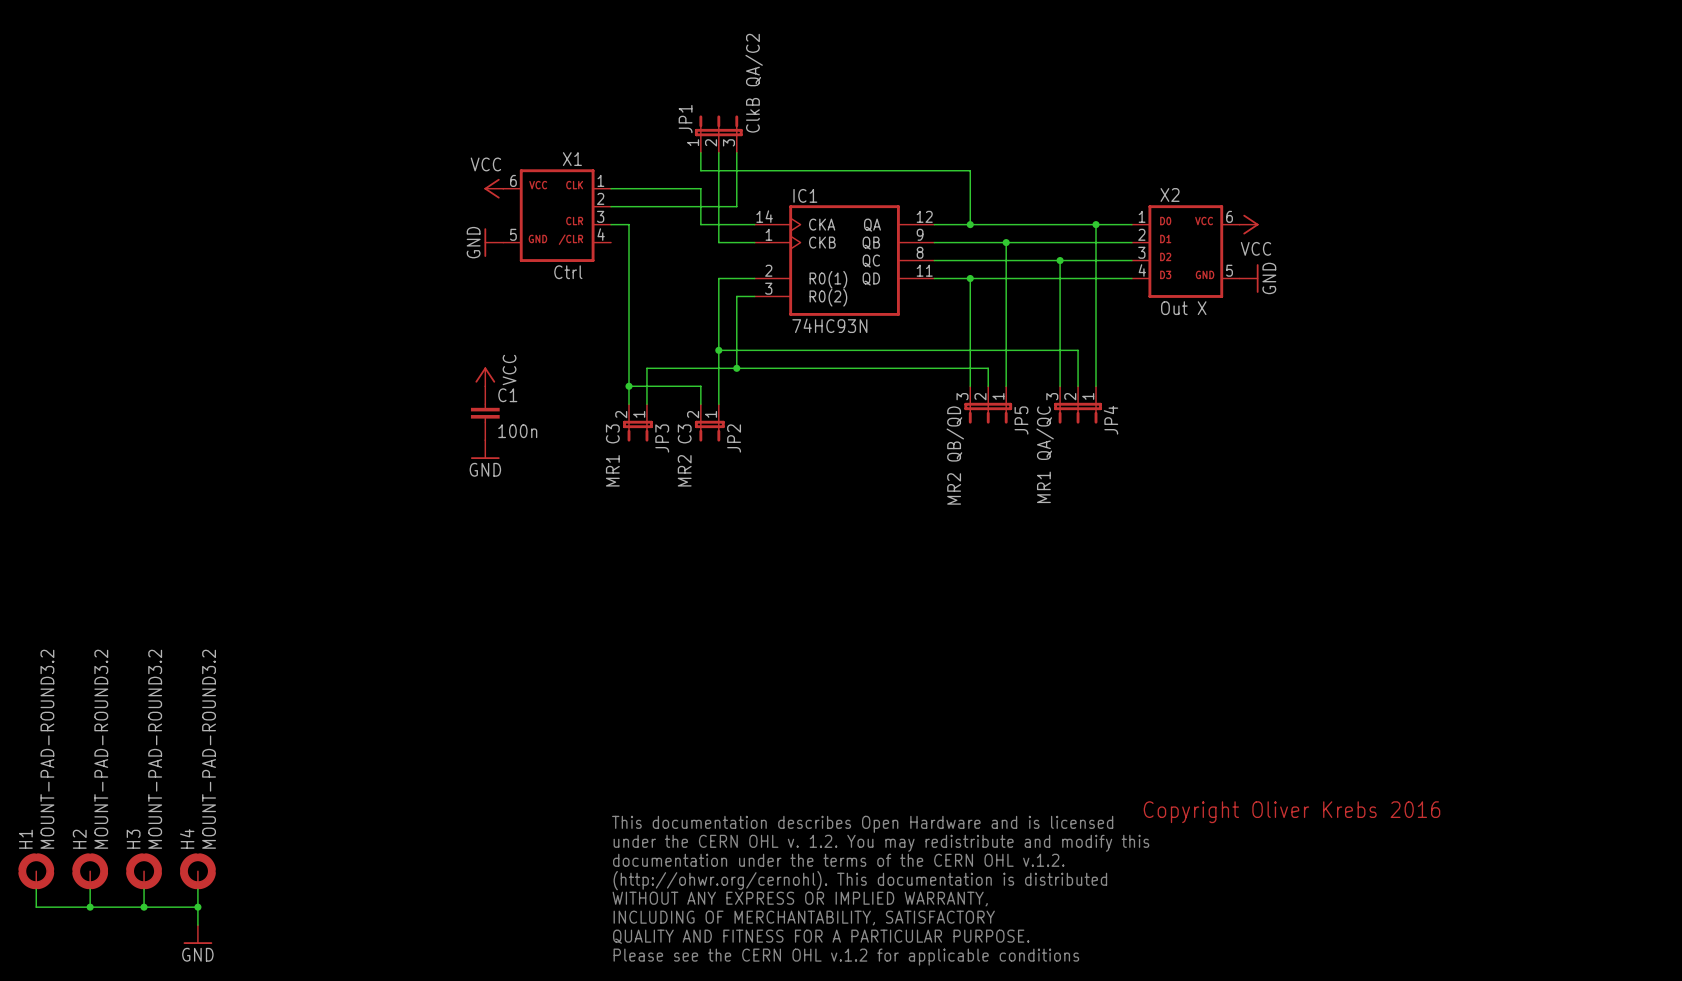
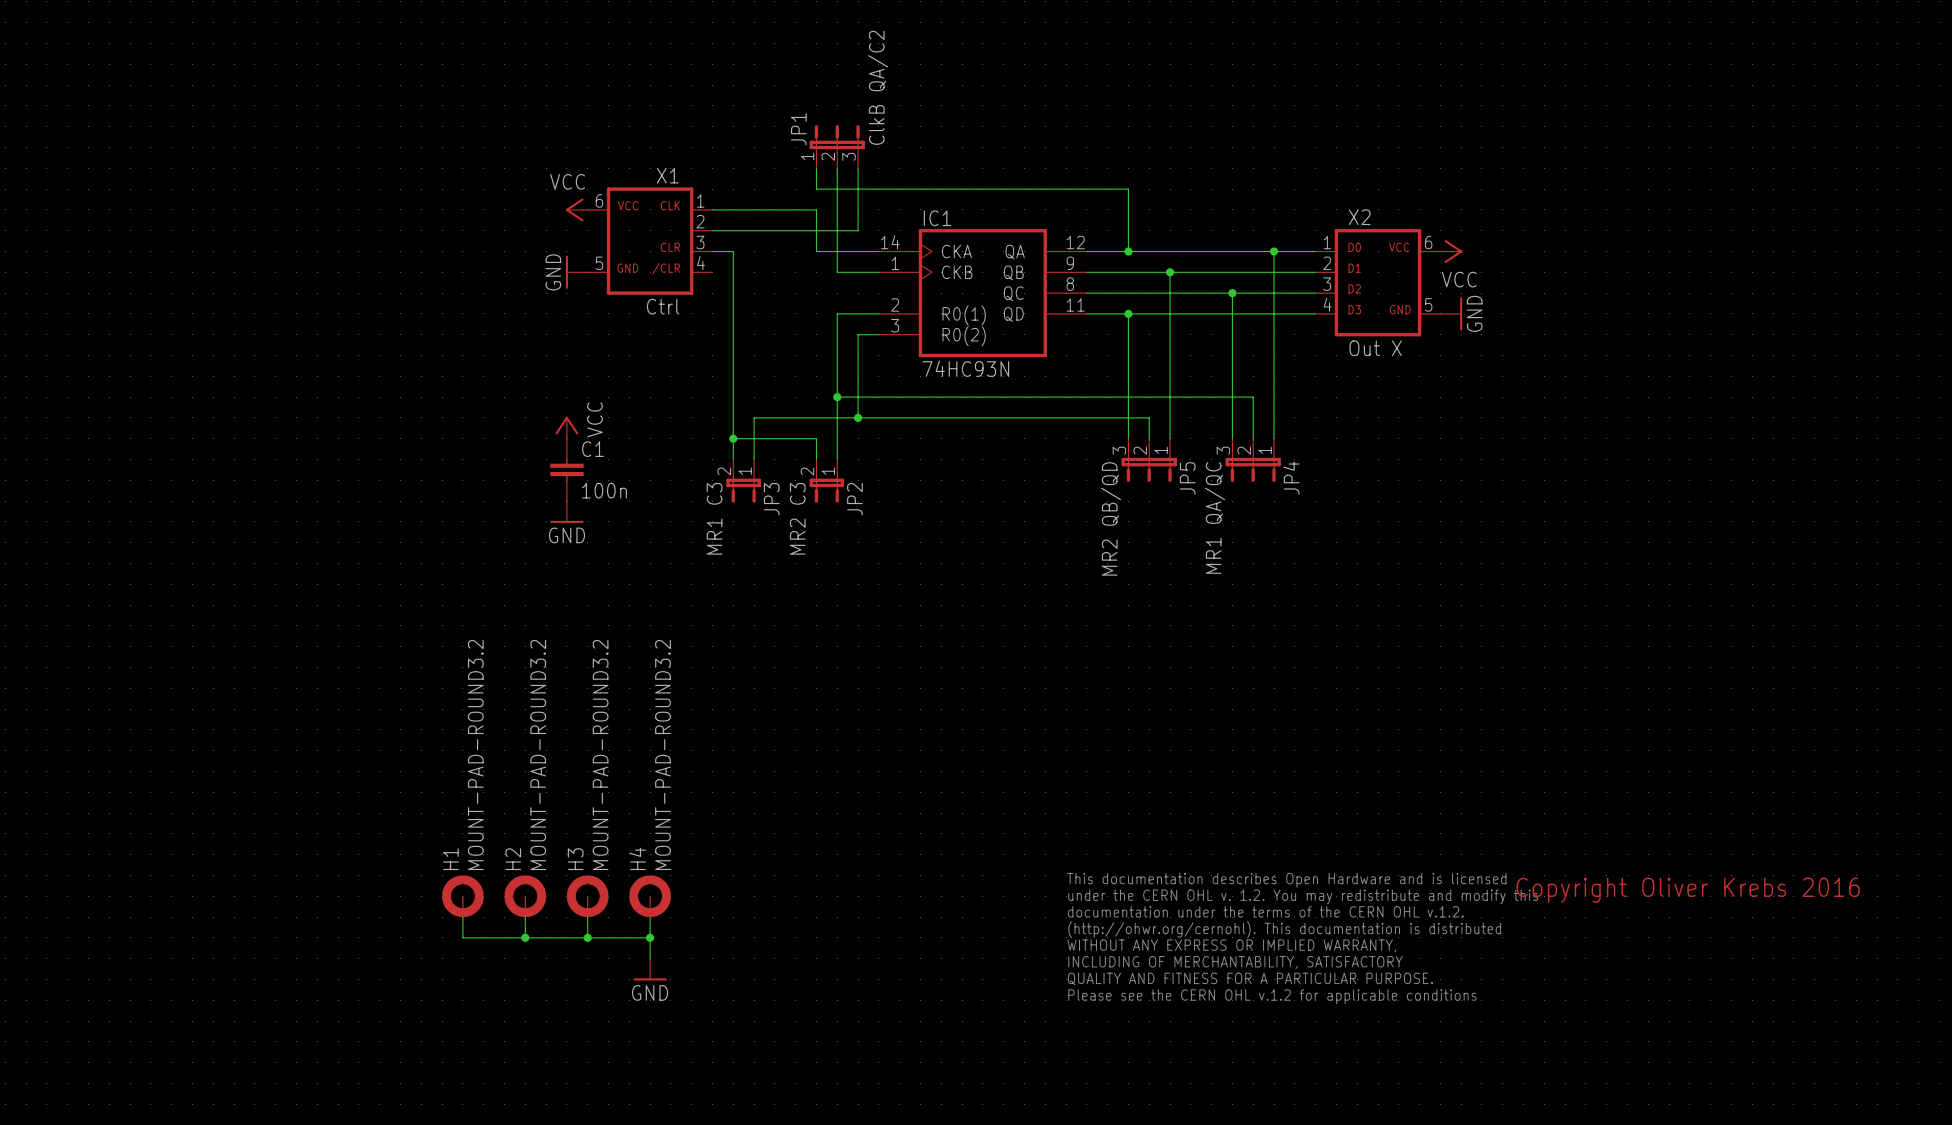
text: none -> This documentation describes Open Hardware and is licensed (1286, 880)
text: none -> under the CERN OHL v. 1.2. You may redistribute and modify this (1303, 896)
text: none -> documentation under the terms of the CERN OHL v.1.2. (1265, 911)
wire: none -> (462, 917) (462, 937) (650, 937)
wire: none -> (525, 917) (525, 937)
wire: none -> (587, 917) (587, 937)
wire: none -> (650, 917) (650, 958)
text: none -> (http://ohwr.org/cernohl). This documentation is distributed (1284, 929)
text position: Copyright Oliver Krebs 2016 (1292, 812) -> Copyright Oliver Krebs 2016 (1688, 890)
junction: none -> (525, 937)
junction: none -> (587, 937)
junction: none -> (650, 937)
text: This documentation describes Open Hardware and is licensed (862, 824) -> none
text: none -> WITHOUT ANY EXPRESS OR IMPLIED WARRANTY, (1231, 945)
text: none -> INCLUDING OF MERCHANTABILITY, SATISFACTORY (1235, 962)
text: under the CERN OHL v. 1.2. You may redistribute and modify this (881, 843) -> none
power symbol: none -> GND (650, 969)
text: none -> QUALITY AND FITNESS FOR A PARTICULAR PURPOSE. (1250, 978)
text: documentation under the terms of the CERN OHL v.1.2. (838, 860) -> none
text: none -> Please see the CERN OHL v.1.2 for applicable conditions (1272, 996)
H1 position: (36, 871) -> (462, 896)
H2 position: (90, 871) -> (525, 896)
H3 position: (144, 871) -> (587, 896)
H4 position: (197, 871) -> (650, 896)
text: (http://ohwr.org/cernohl). This documentation is distributed (860, 880) -> none
wire: (36, 889) (36, 907) (197, 907) -> none
wire: (90, 889) (90, 907) -> none
wire: (144, 889) (144, 907) -> none
wire: (197, 889) (197, 925) -> none
text: WITHOUT ANY EXPRESS OR IMPLIED WARRANTY, (800, 899) -> none
junction: (90, 907) -> none
junction: (144, 907) -> none
junction: (197, 907) -> none
text: INCLUDING OF MERCHANTABILITY, SATISFACTORY (804, 918) -> none
power symbol: GND (197, 934) -> none
text: QUALITY AND FITNESS FOR A PARTICULAR PURPOSE. (821, 936) -> none
text: Please see the CERN OHL v.1.2 for applicable conditions (846, 957) -> none

